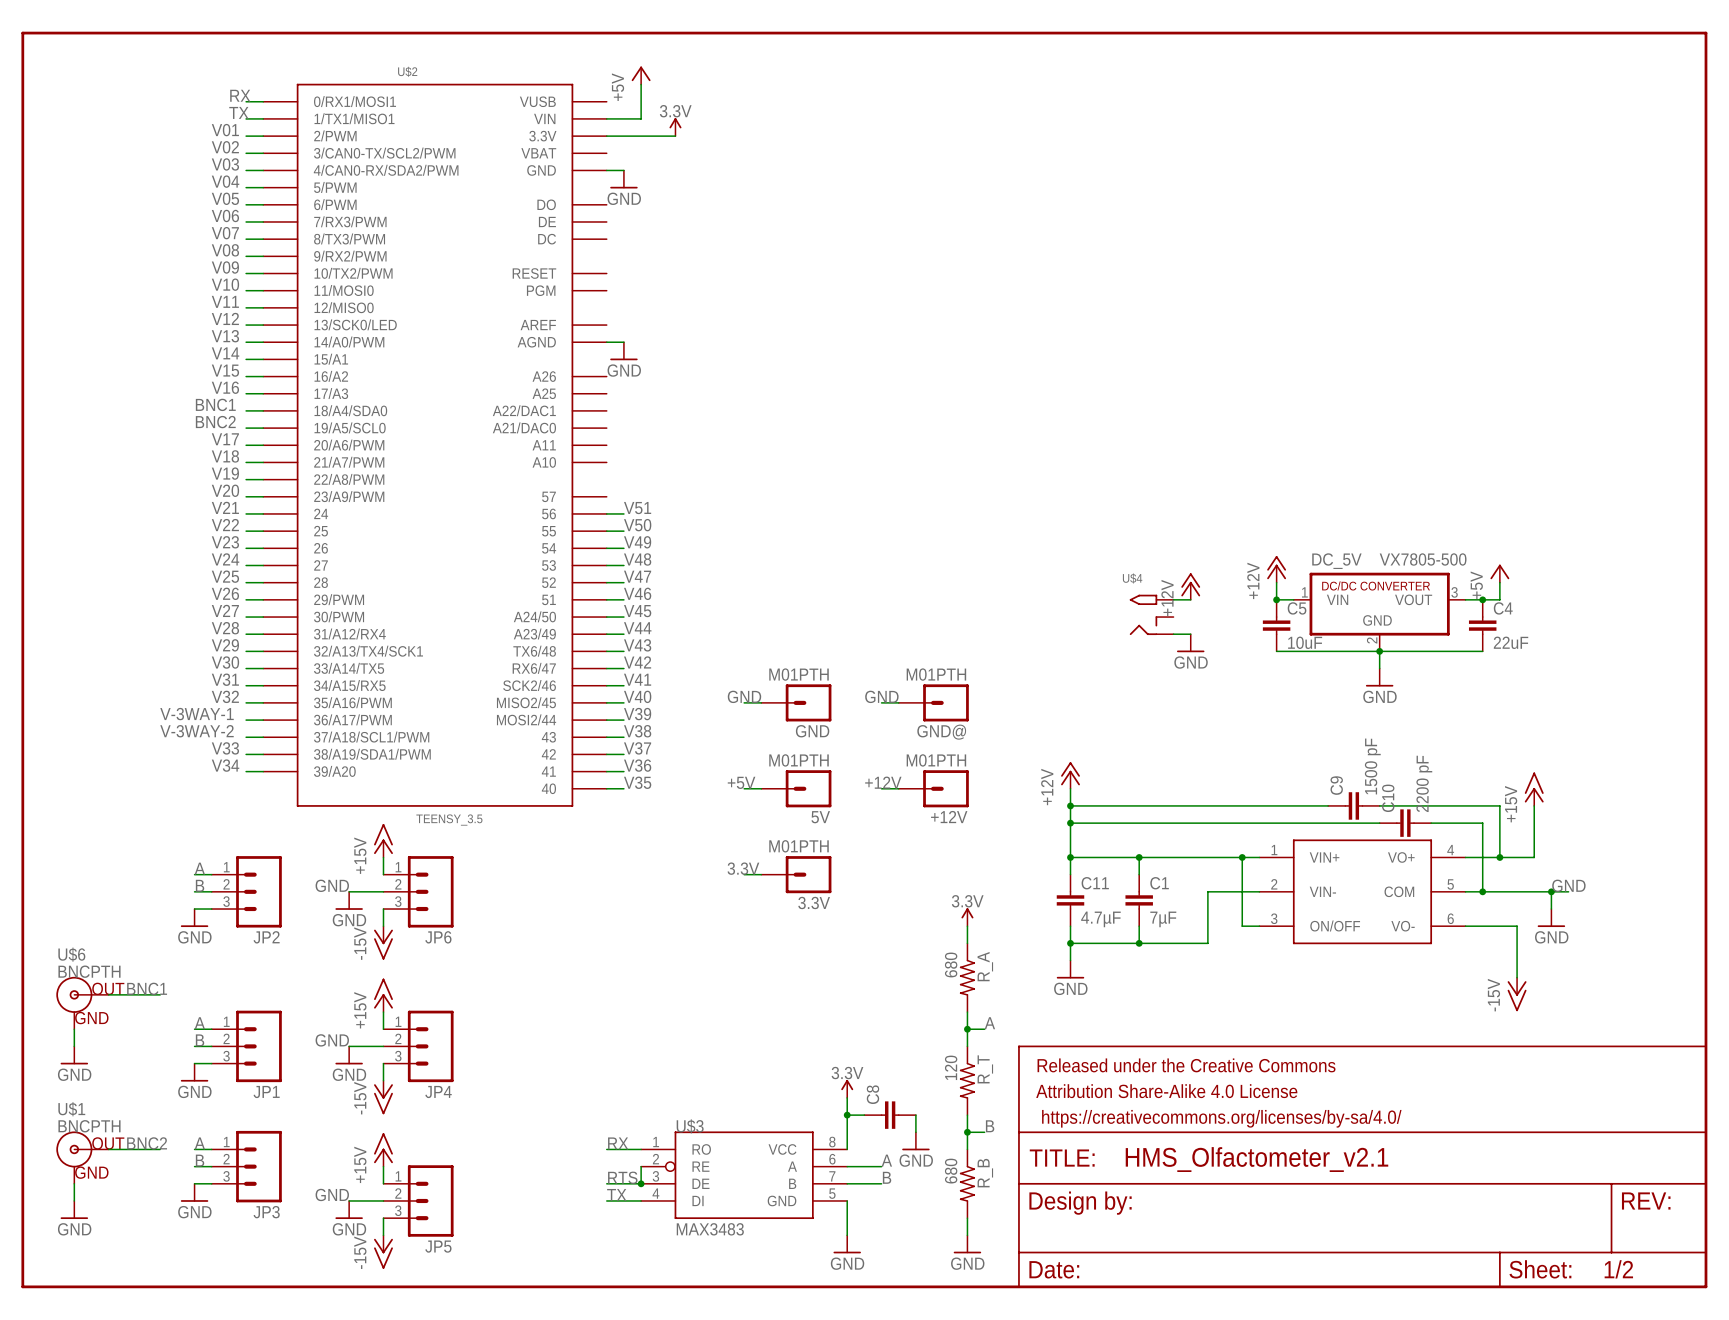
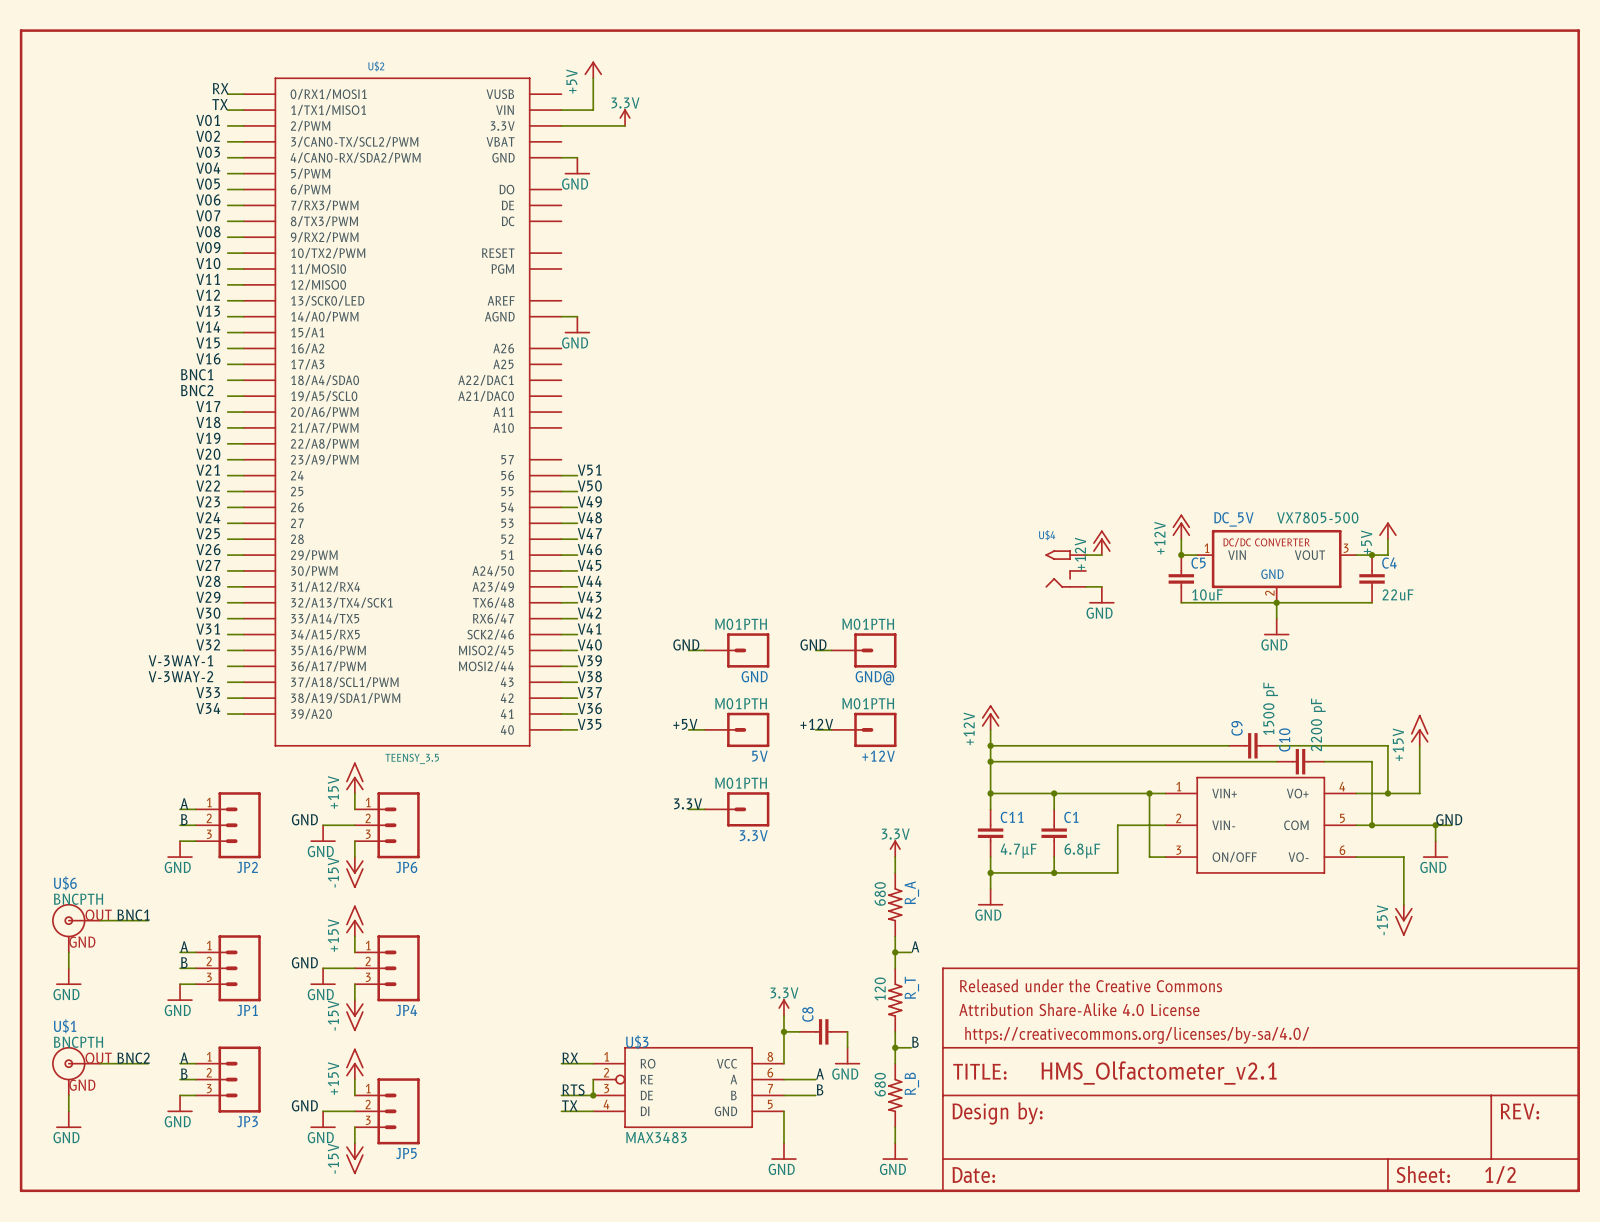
C1 value: 7µF (1163, 919) -> 6.8µF (1082, 850)

